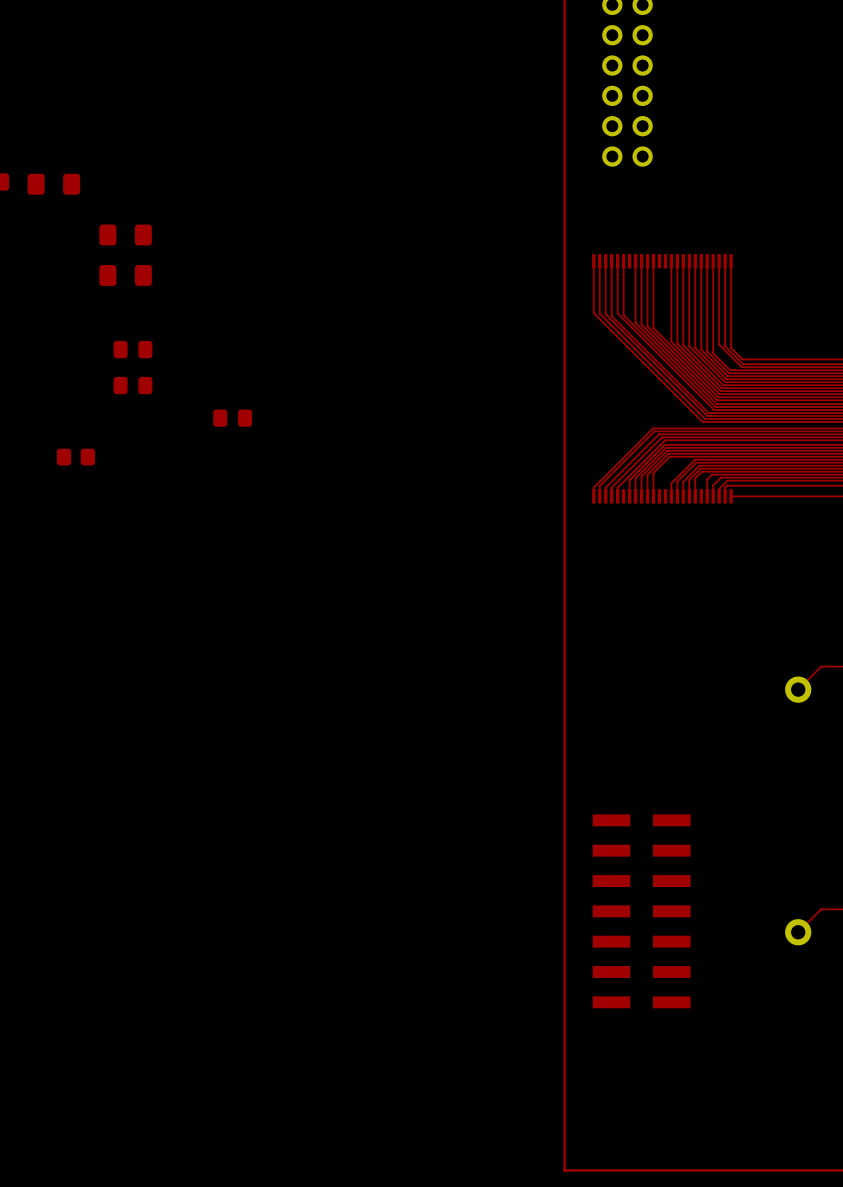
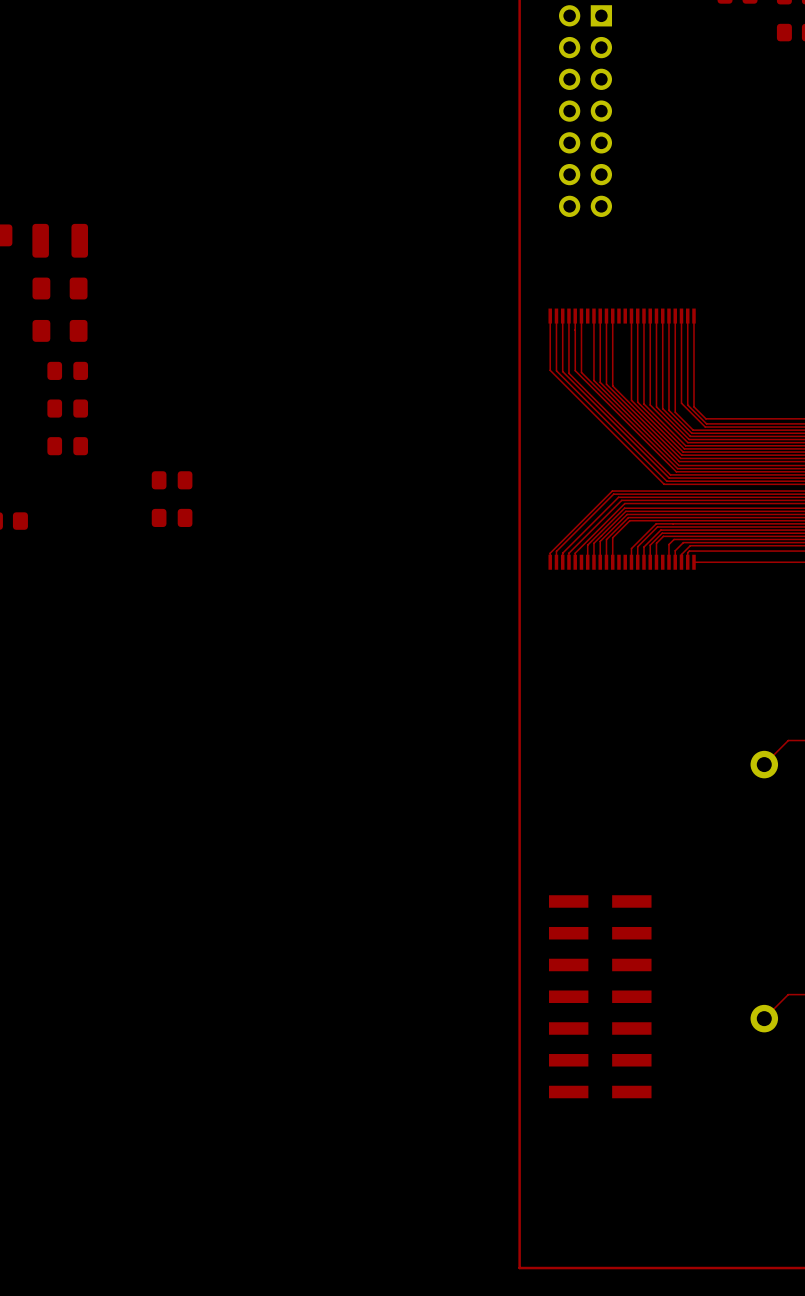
part: none -> (60, 240)
part: none -> (67, 370)
part: none -> (172, 517)

